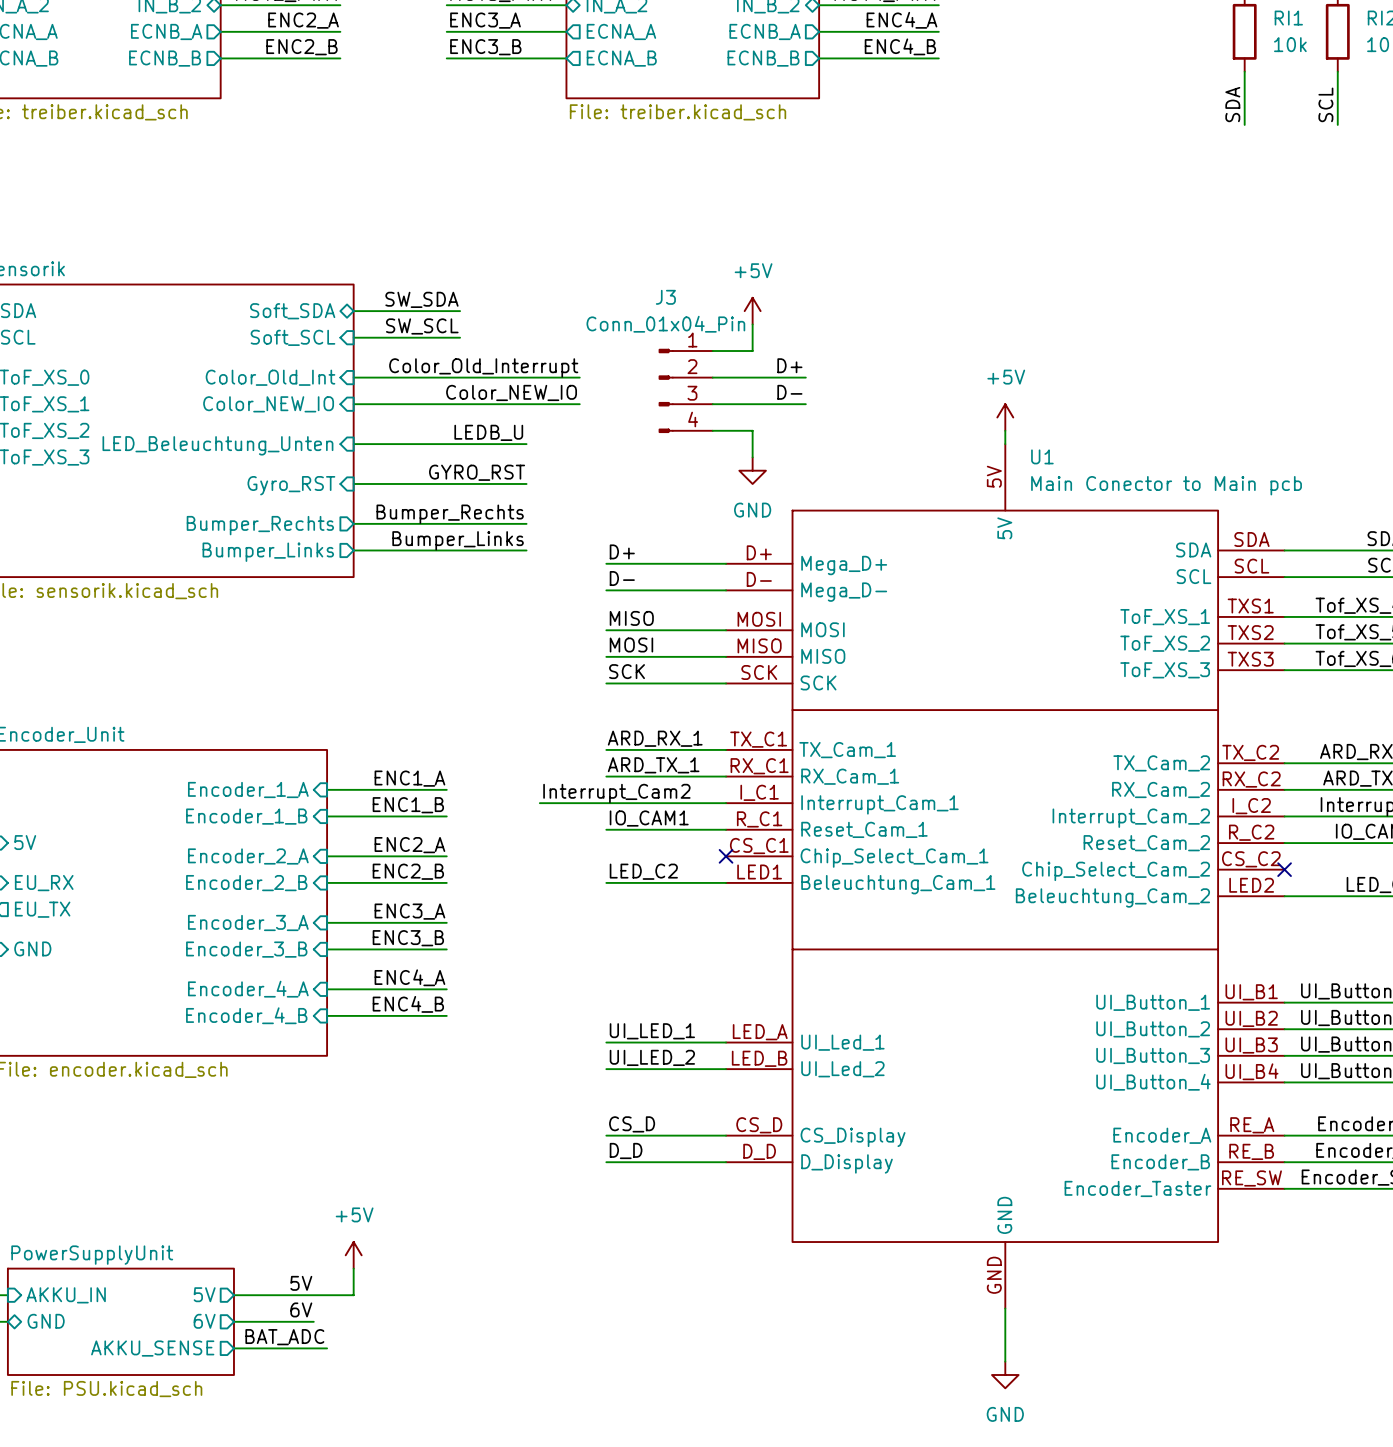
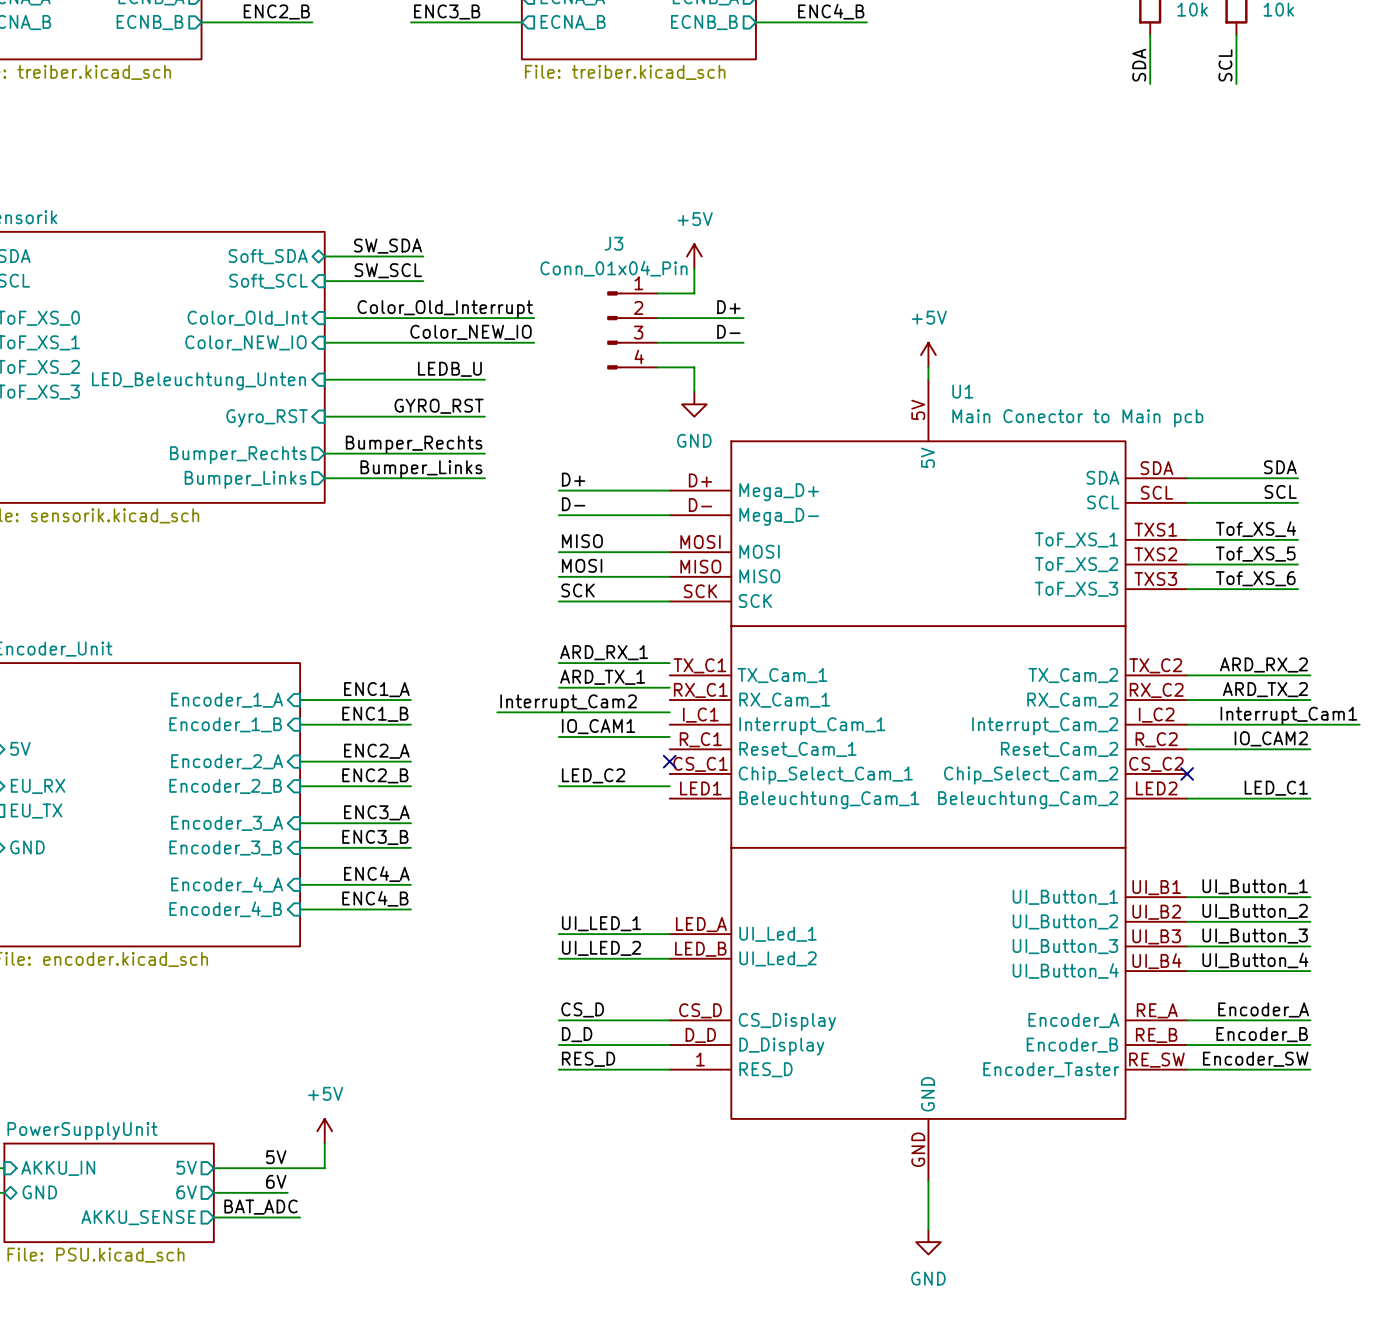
U1 symbol: [726, 444, 1285, 1309] -> [669, 379, 1188, 1181]
label: none -> RES_D (588, 1059)
wire: none -> (558, 1069) (669, 1069)

